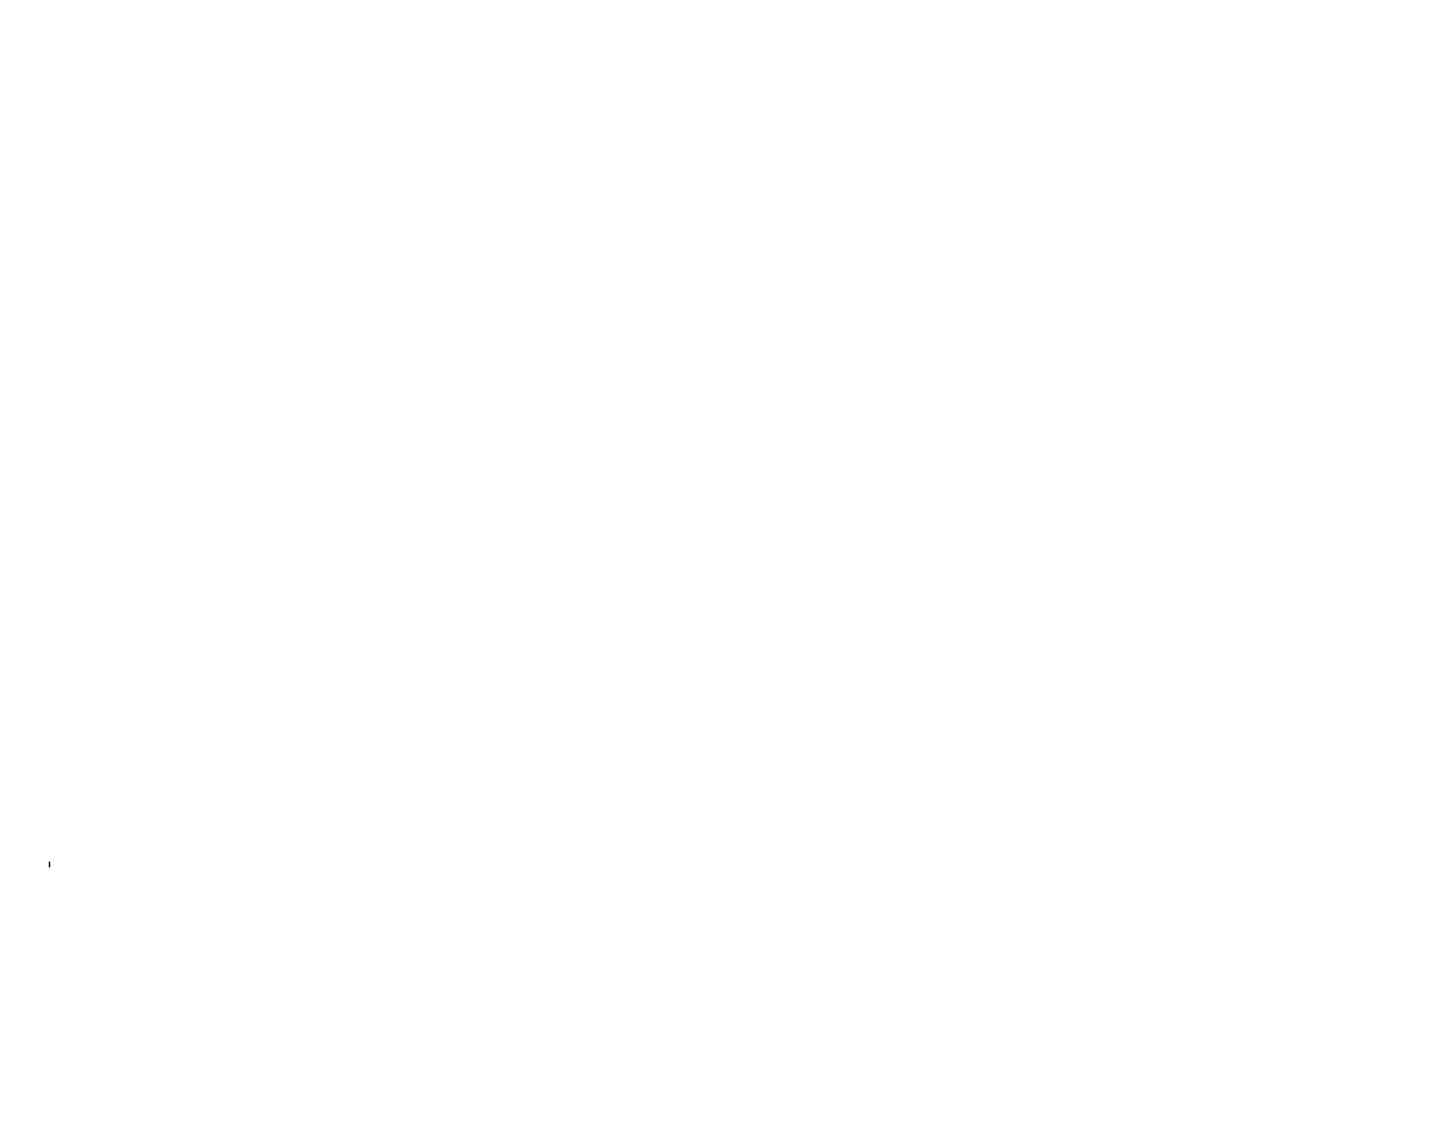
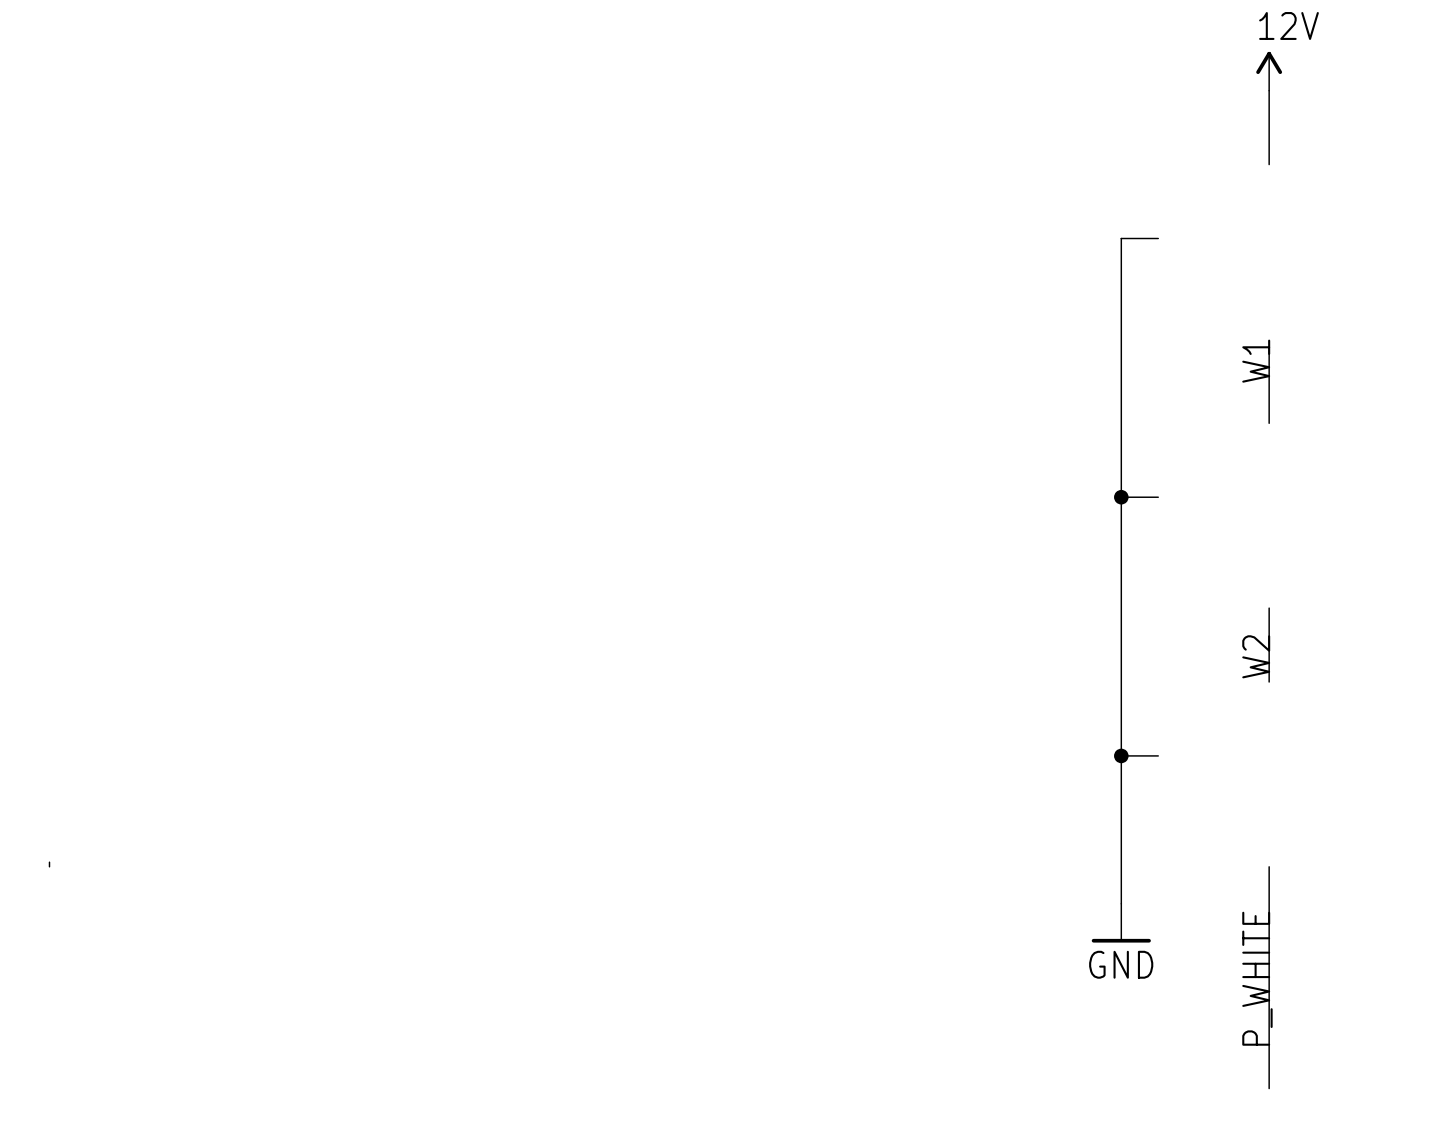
power symbol: none -> 12V (1269, 71)
wire: none -> (1269, 90) (1269, 164)
wire: none -> (1158, 238) (1121, 238) (1121, 903)
wire: none -> (1269, 349) (1269, 423)
label: none -> W1 (1256, 361)
wire: none -> (1121, 497) (1158, 497)
junction: none -> (1121, 497)
wire: none -> (1269, 608) (1269, 682)
label: none -> W2 (1256, 656)
wire: none -> (1121, 755) (1158, 755)
junction: none -> (1121, 755)
wire: none -> (1269, 866) (1269, 1088)
power symbol: none -> GND (1121, 923)
label: none -> P_WHITE (1257, 978)

